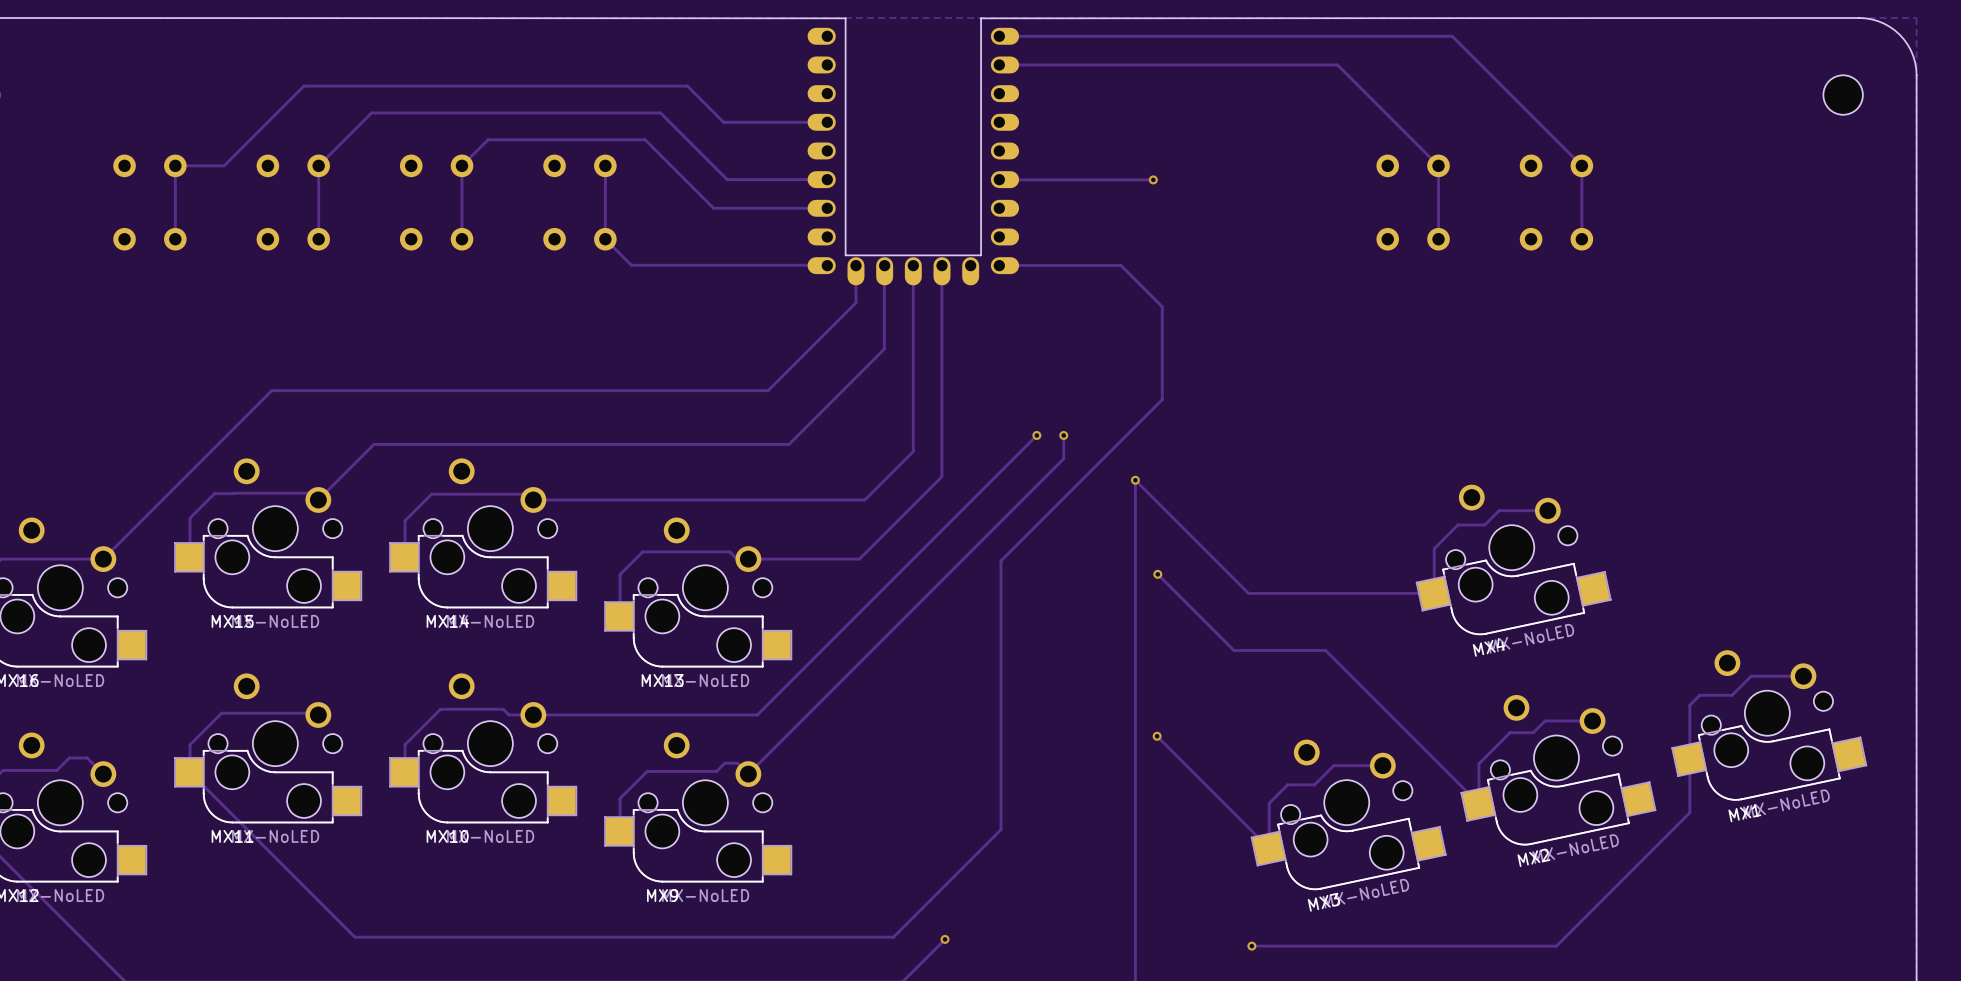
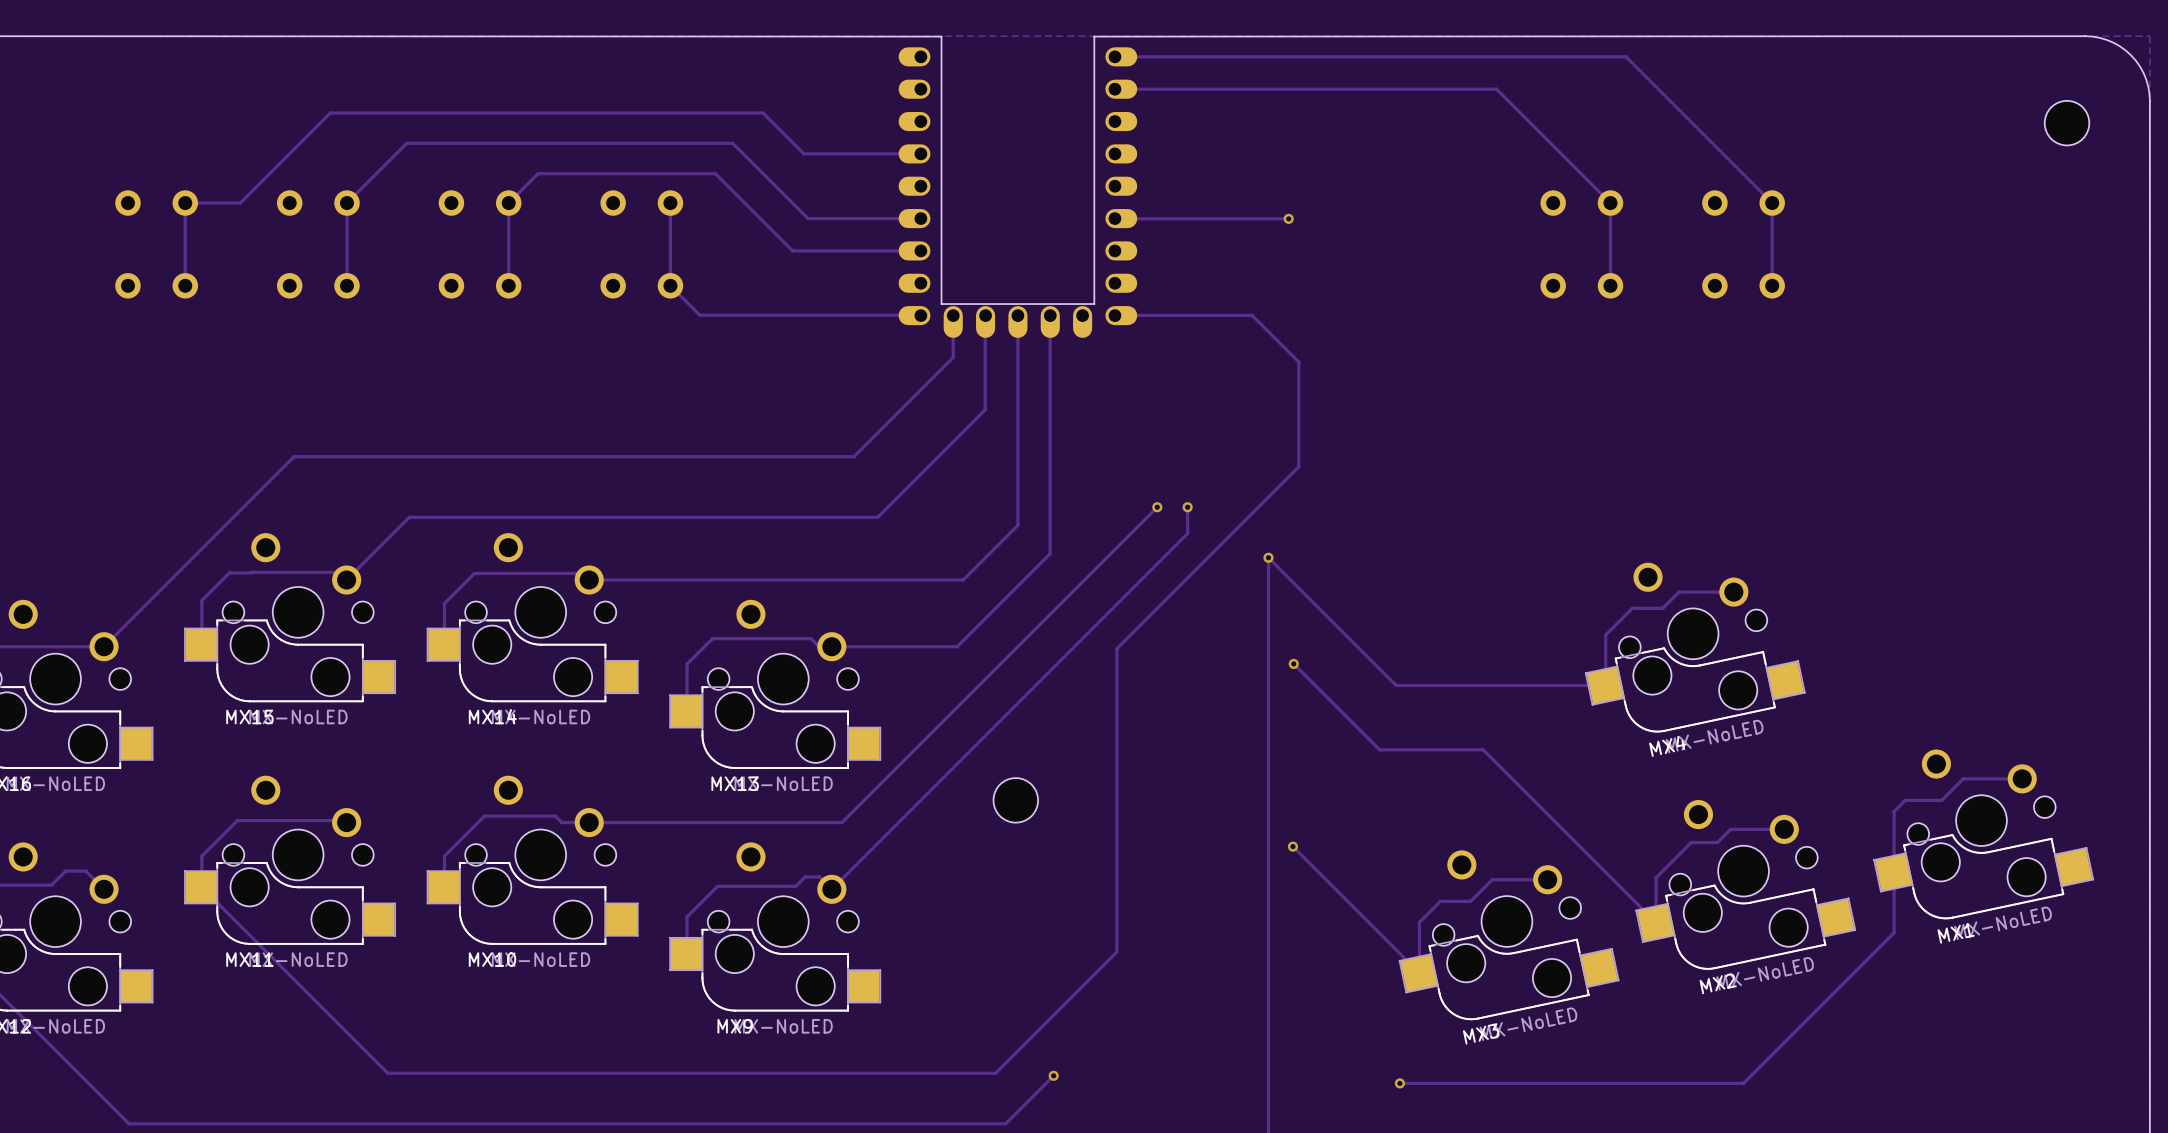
part: none -> (1015, 800)

